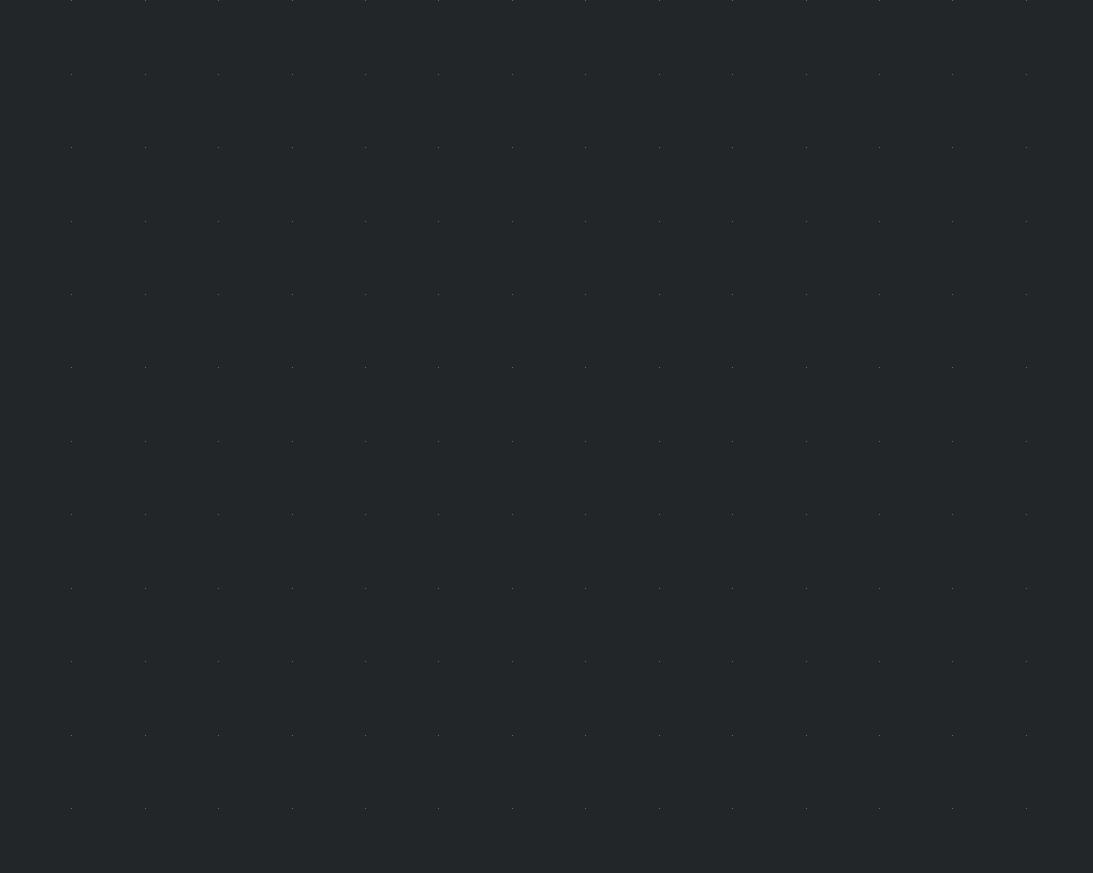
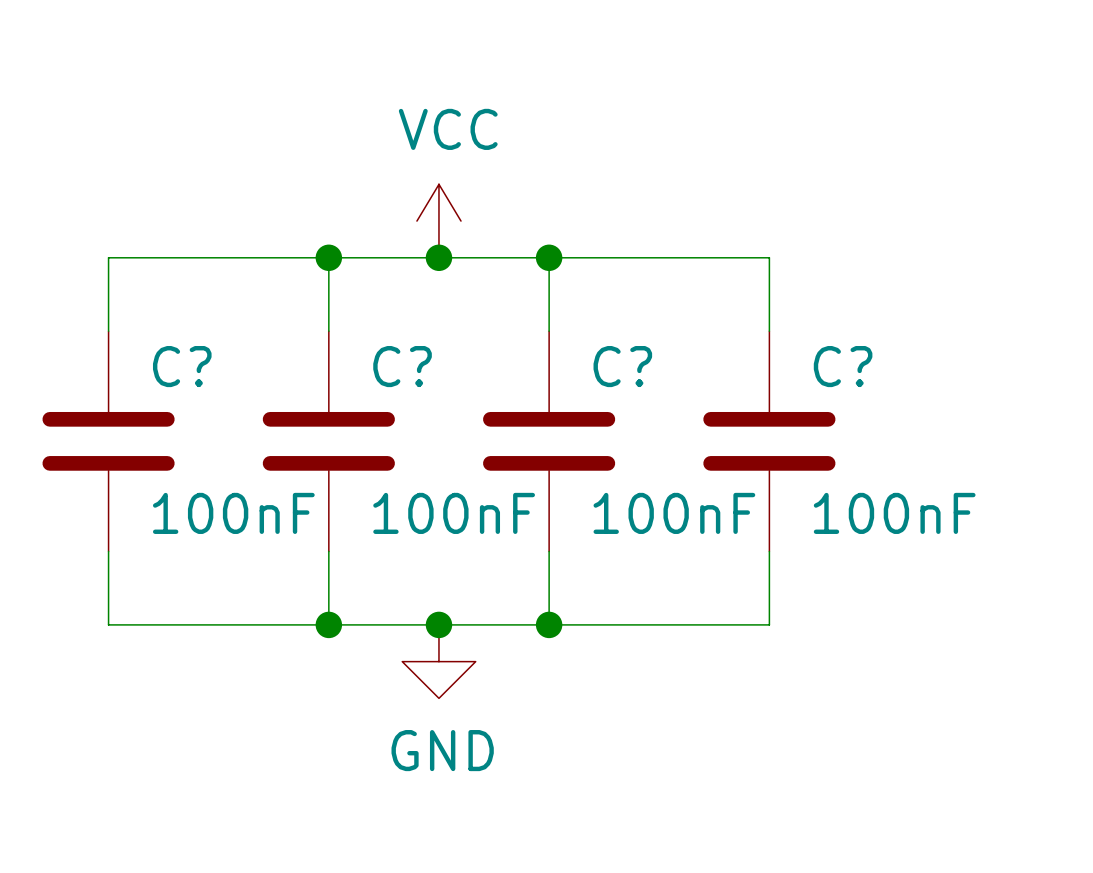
power symbol: none -> VCC (438, 221)
wire: none -> (328, 257) (328, 331)
junction: none -> (328, 257)
junction: none -> (438, 257)
wire: none -> (549, 257) (549, 331)
junction: none -> (549, 257)
wire: none -> (108, 331) (108, 257) (769, 257) (769, 331)
C?: none -> 100nF (108, 441)
C?: none -> 100nF (328, 441)
C?: none -> 100nF (549, 441)
C?: none -> 100nF (769, 441)
wire: none -> (108, 551) (108, 624) (769, 624) (769, 551)
wire: none -> (328, 551) (328, 624)
wire: none -> (549, 551) (549, 624)
junction: none -> (328, 624)
junction: none -> (438, 624)
junction: none -> (549, 624)
power symbol: none -> GND (438, 661)

